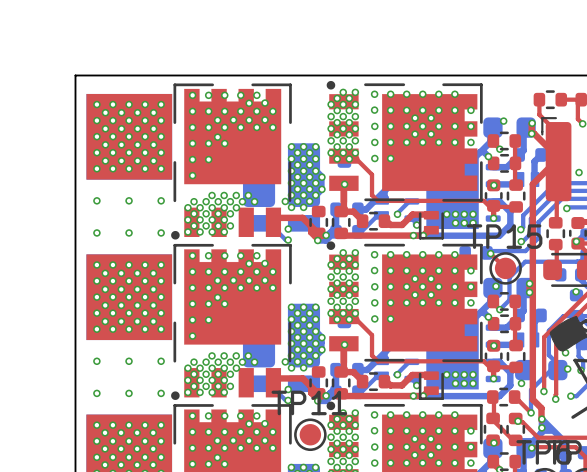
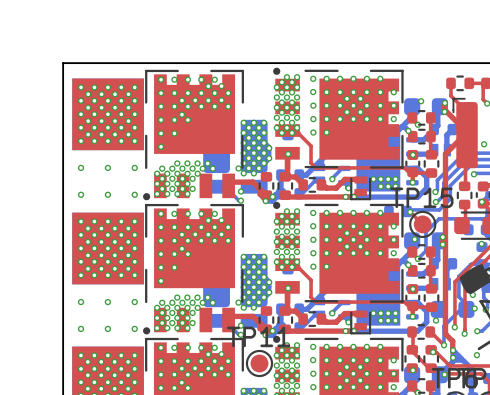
via: none -> (476, 355)

